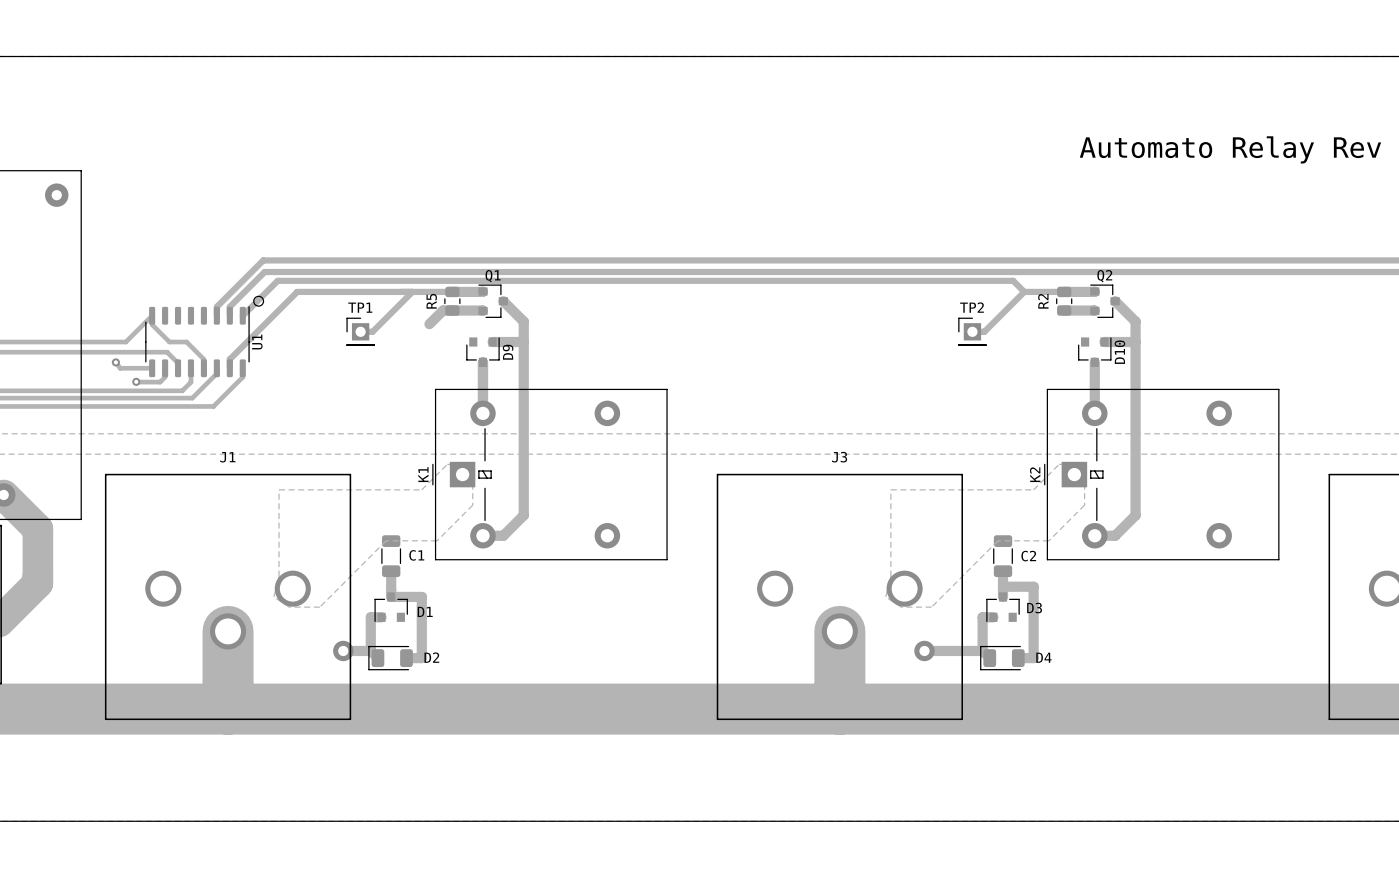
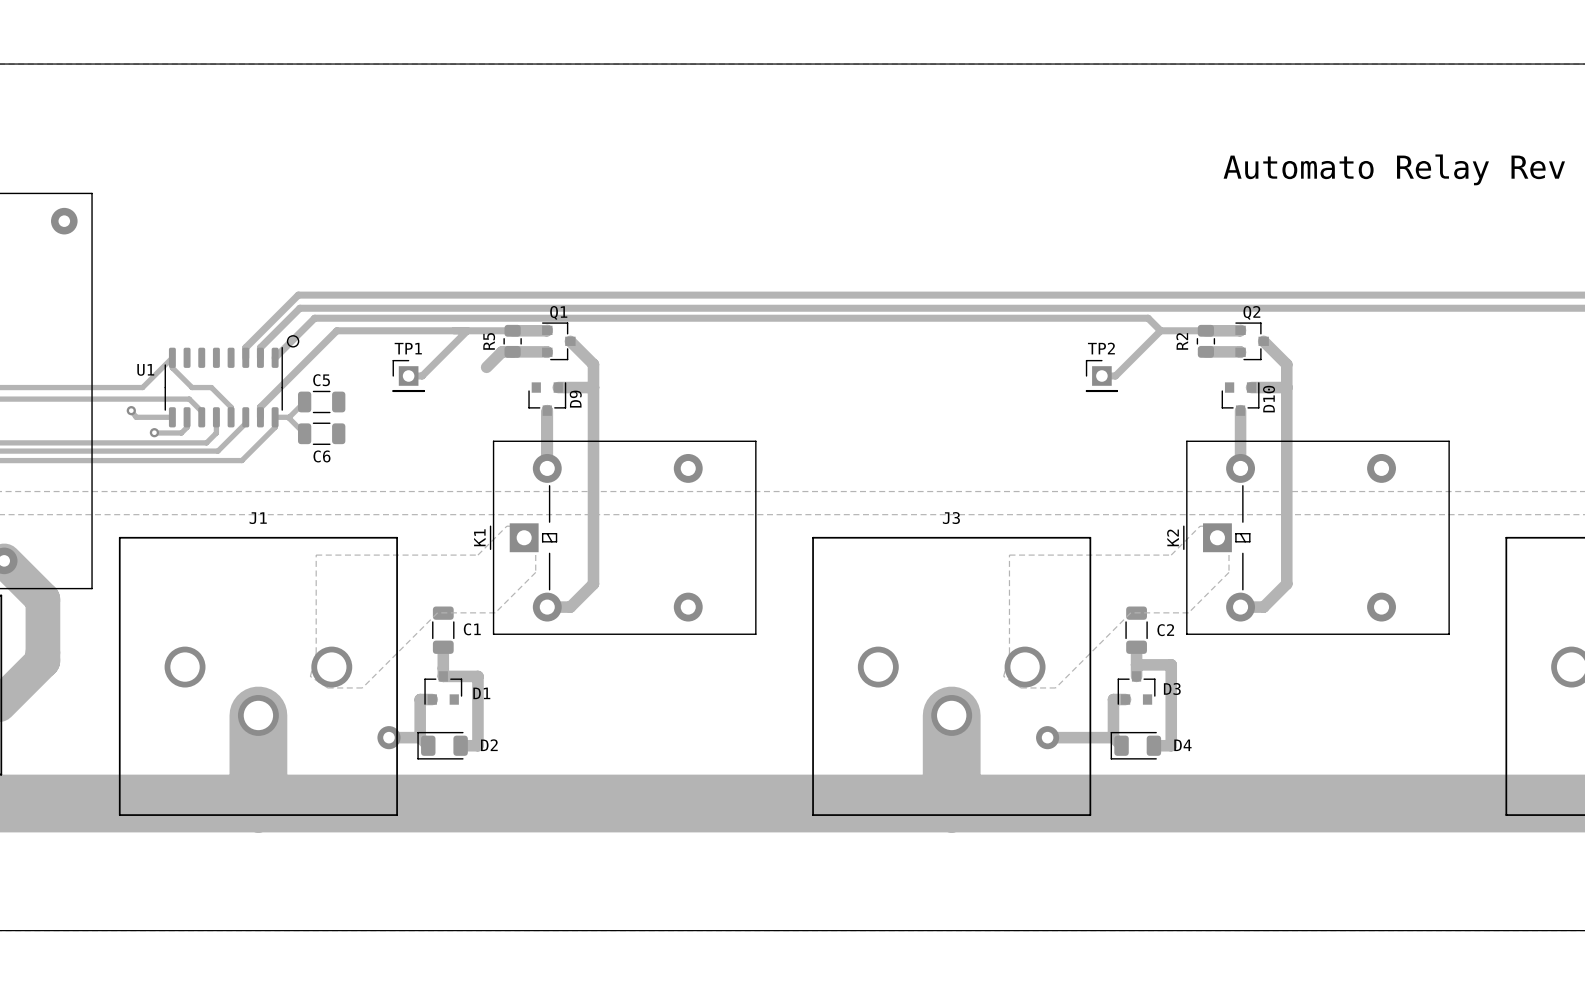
U1 name rotation: 0° (257, 341) -> 90° clockwise (145, 369)
U1 name position: U1 (257, 341) -> U1 (145, 369)
track: none -> (304, 401) (289, 417)
C5: none -> (321, 401)
track: none -> (275, 417) (289, 417)
track: none -> (289, 417) (304, 433)
C6: none -> (321, 433)

